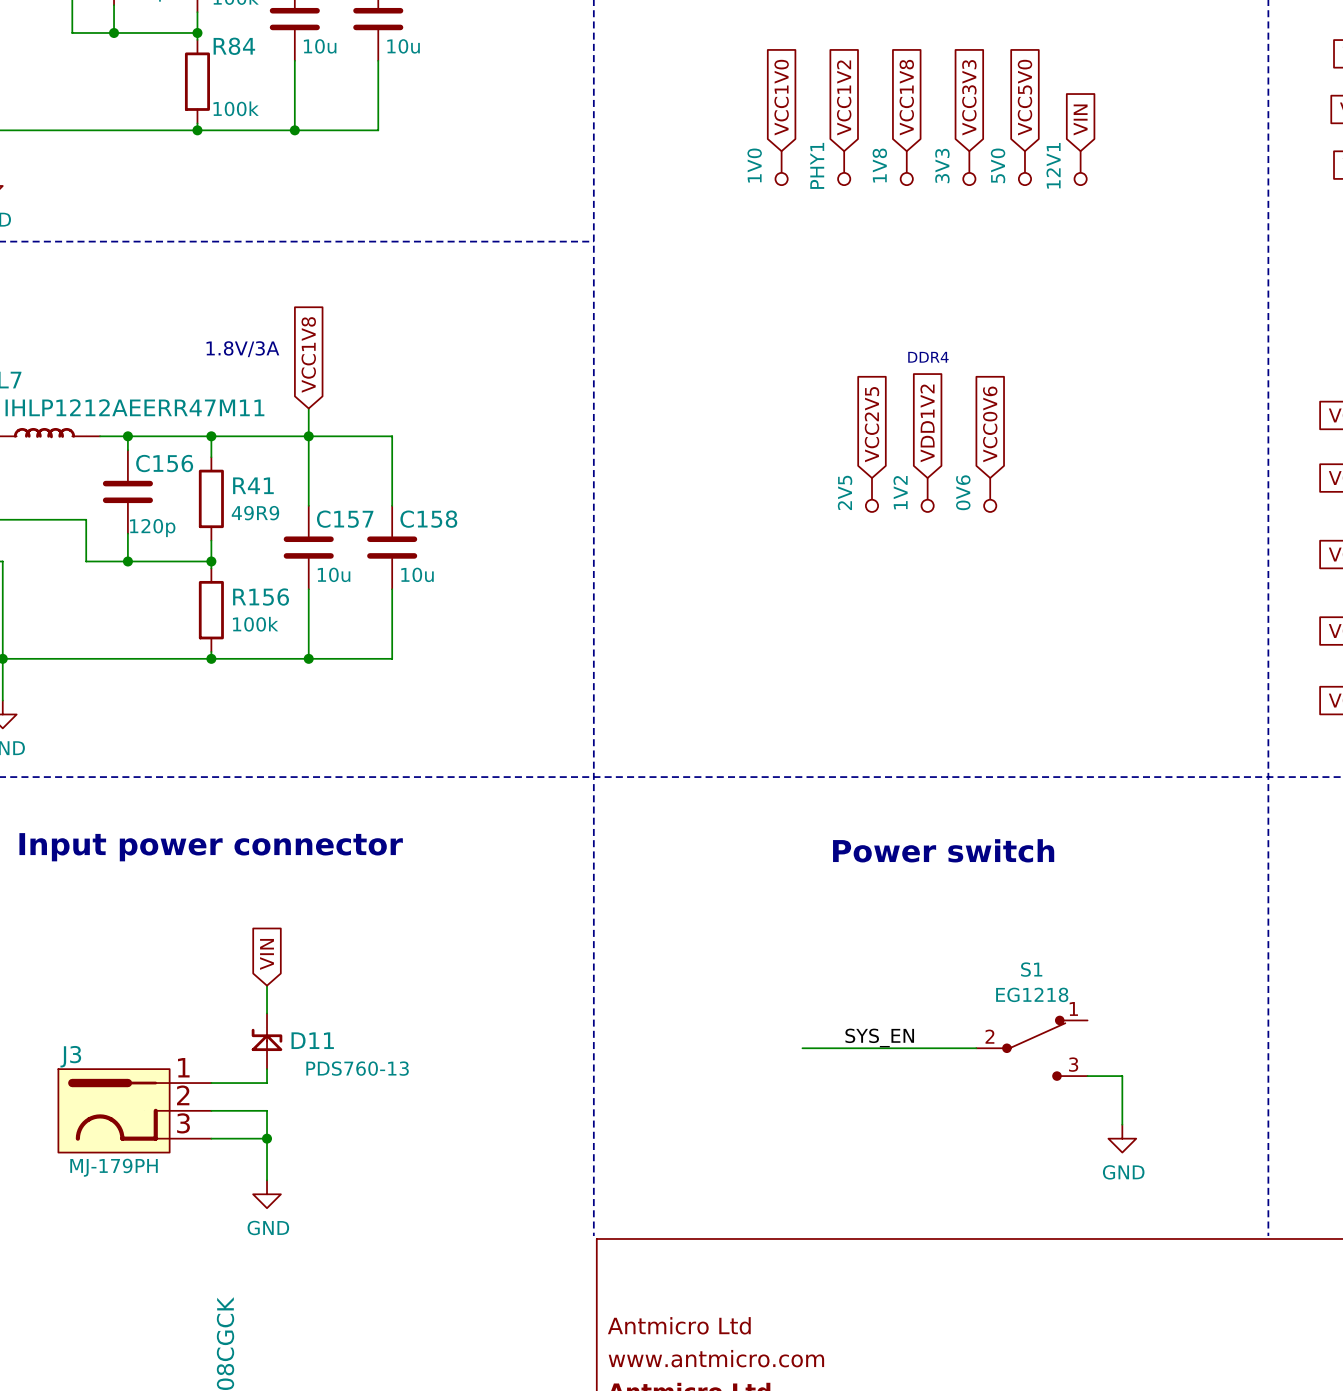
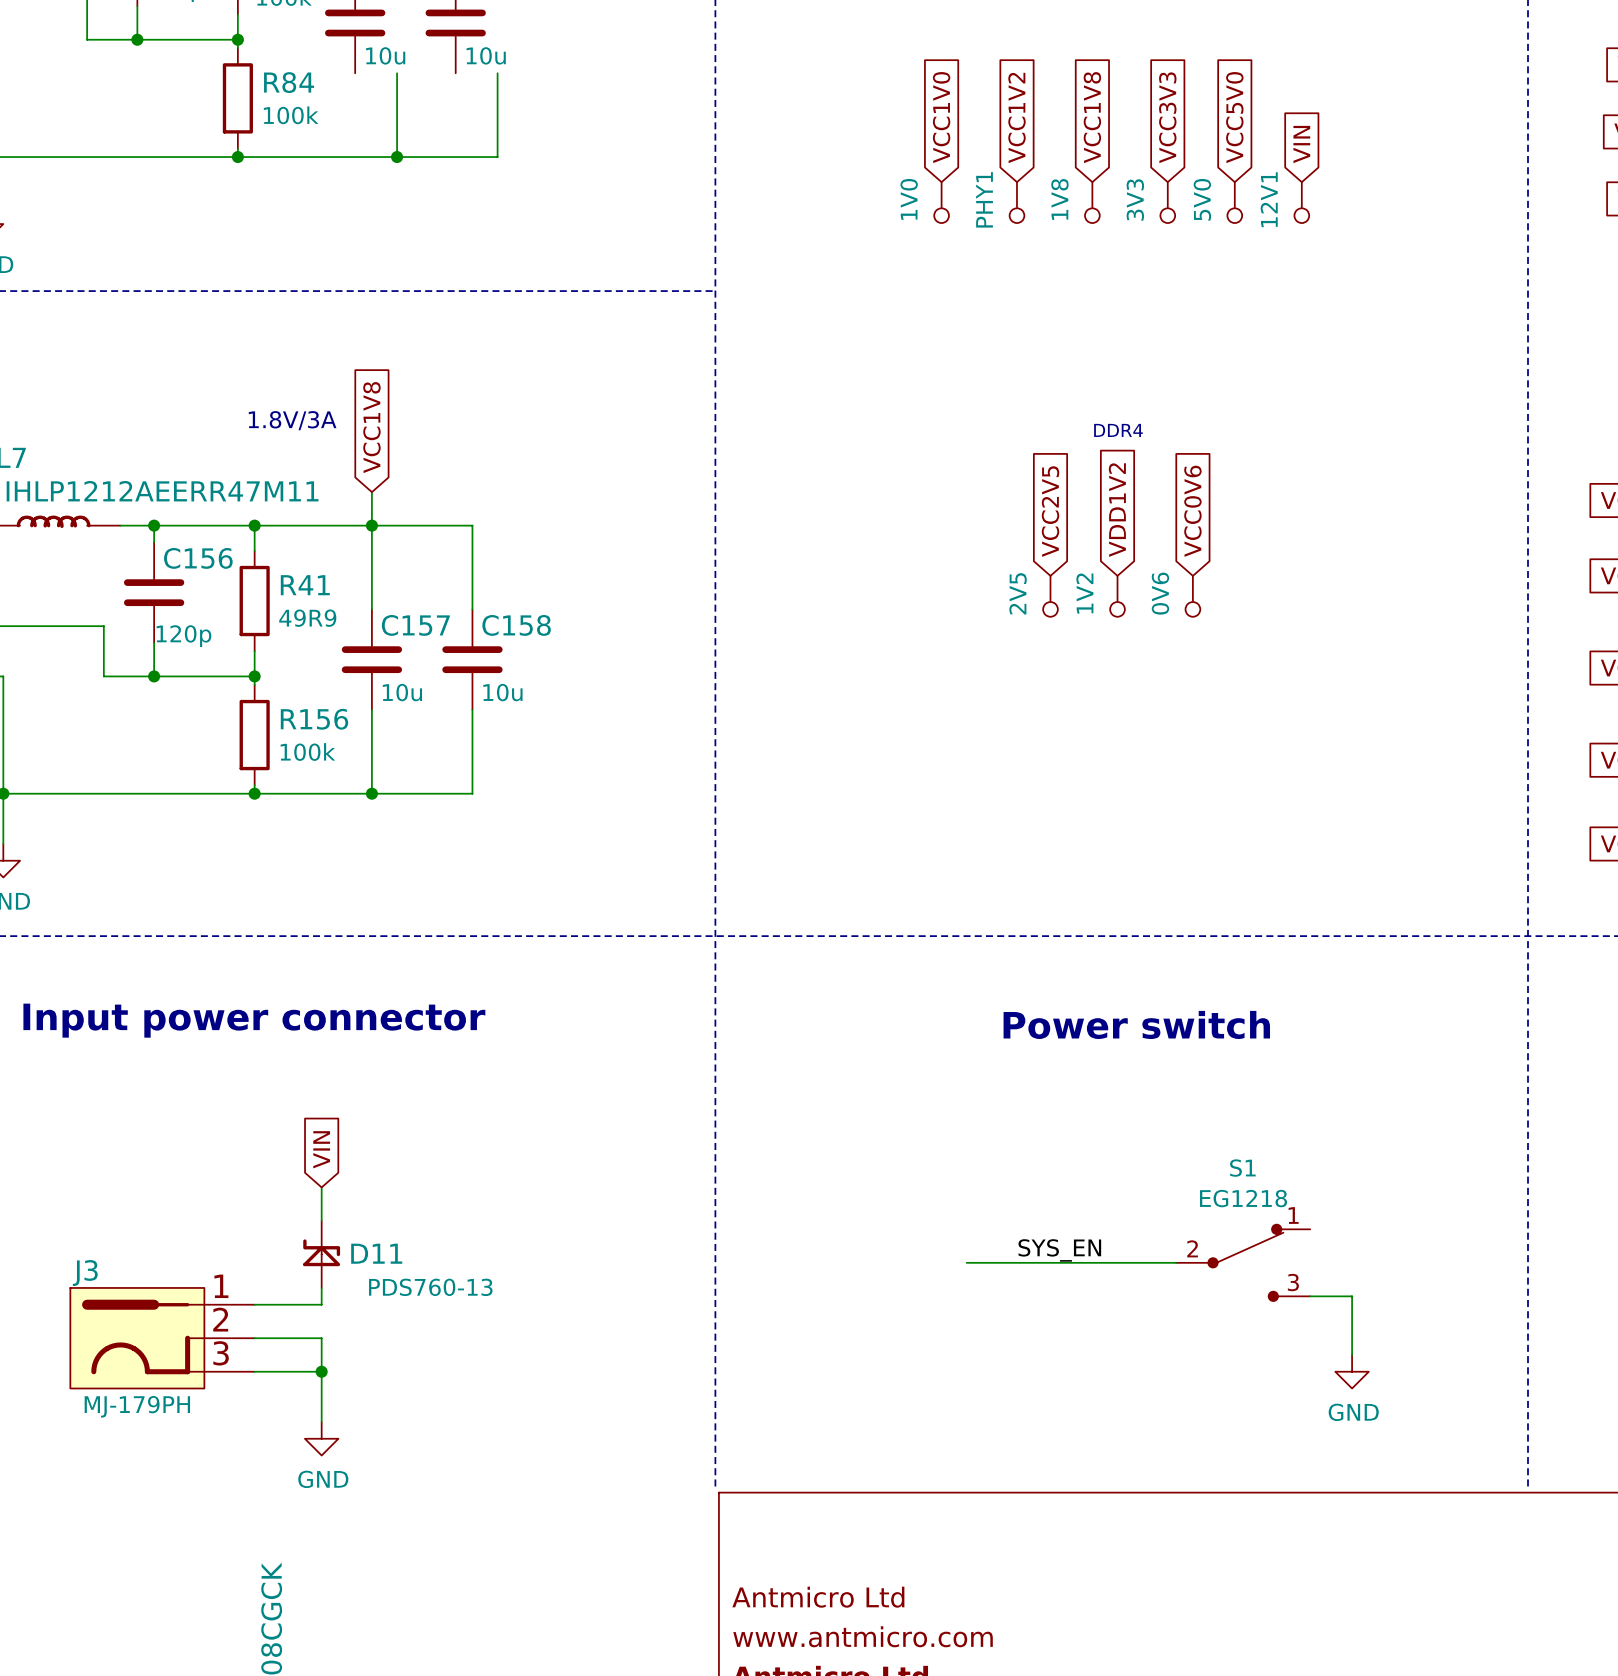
R84 name position: R84 (234, 46) -> R84 (289, 82)
wire: (294, 60) (294, 130) -> (397, 73) (397, 157)
wire: (378, 60) (378, 130) -> (497, 73) (497, 157) (455, 157)
R84 text position: 100k (236, 108) -> 100k (291, 115)
junction position: (294, 130) -> (397, 157)

